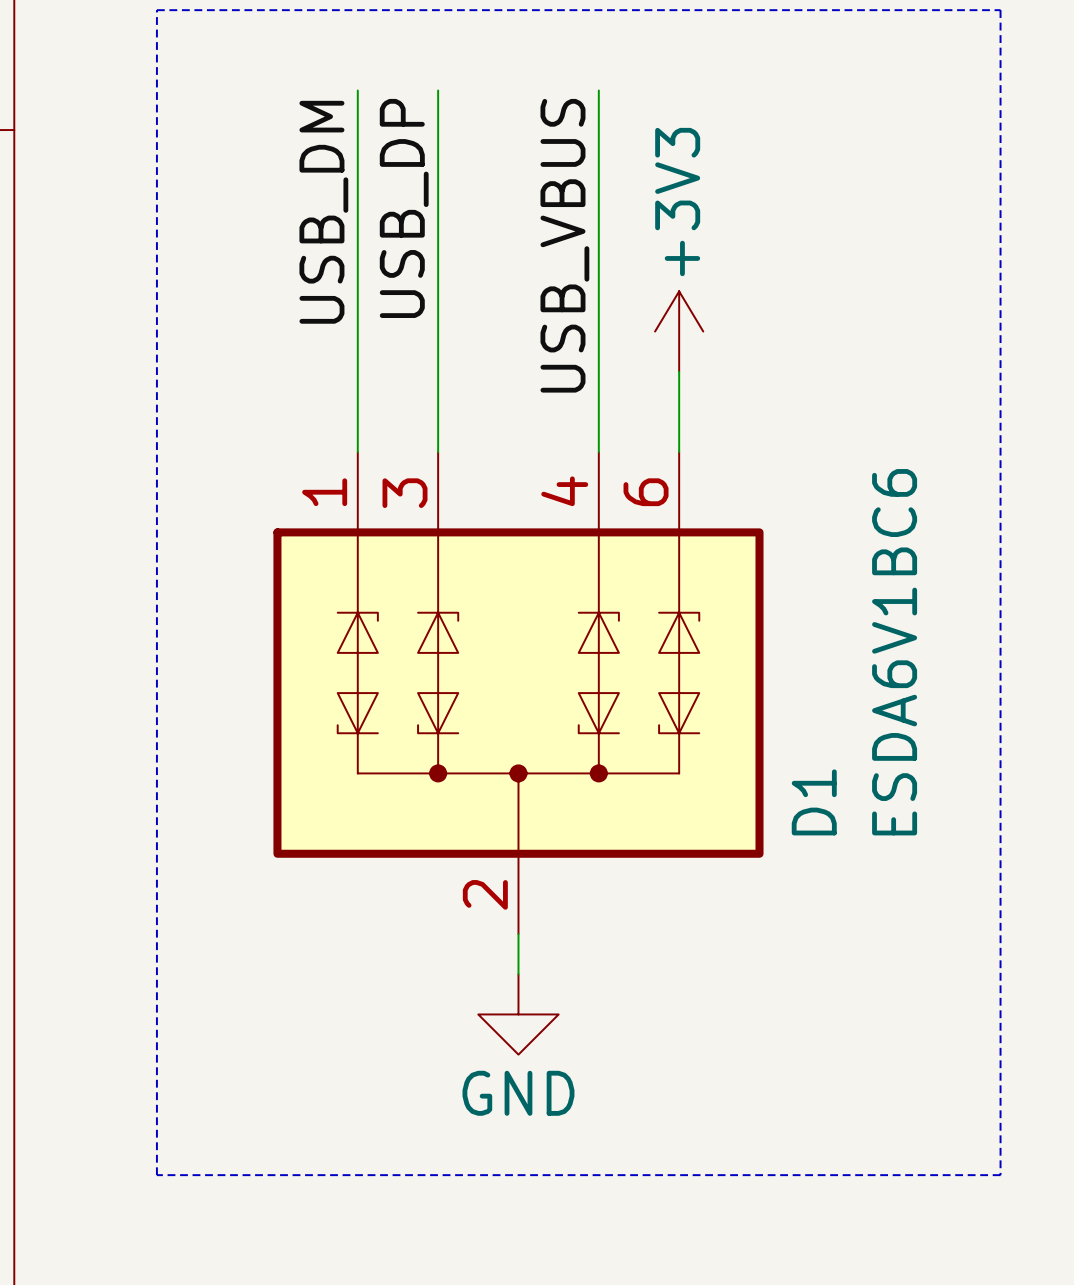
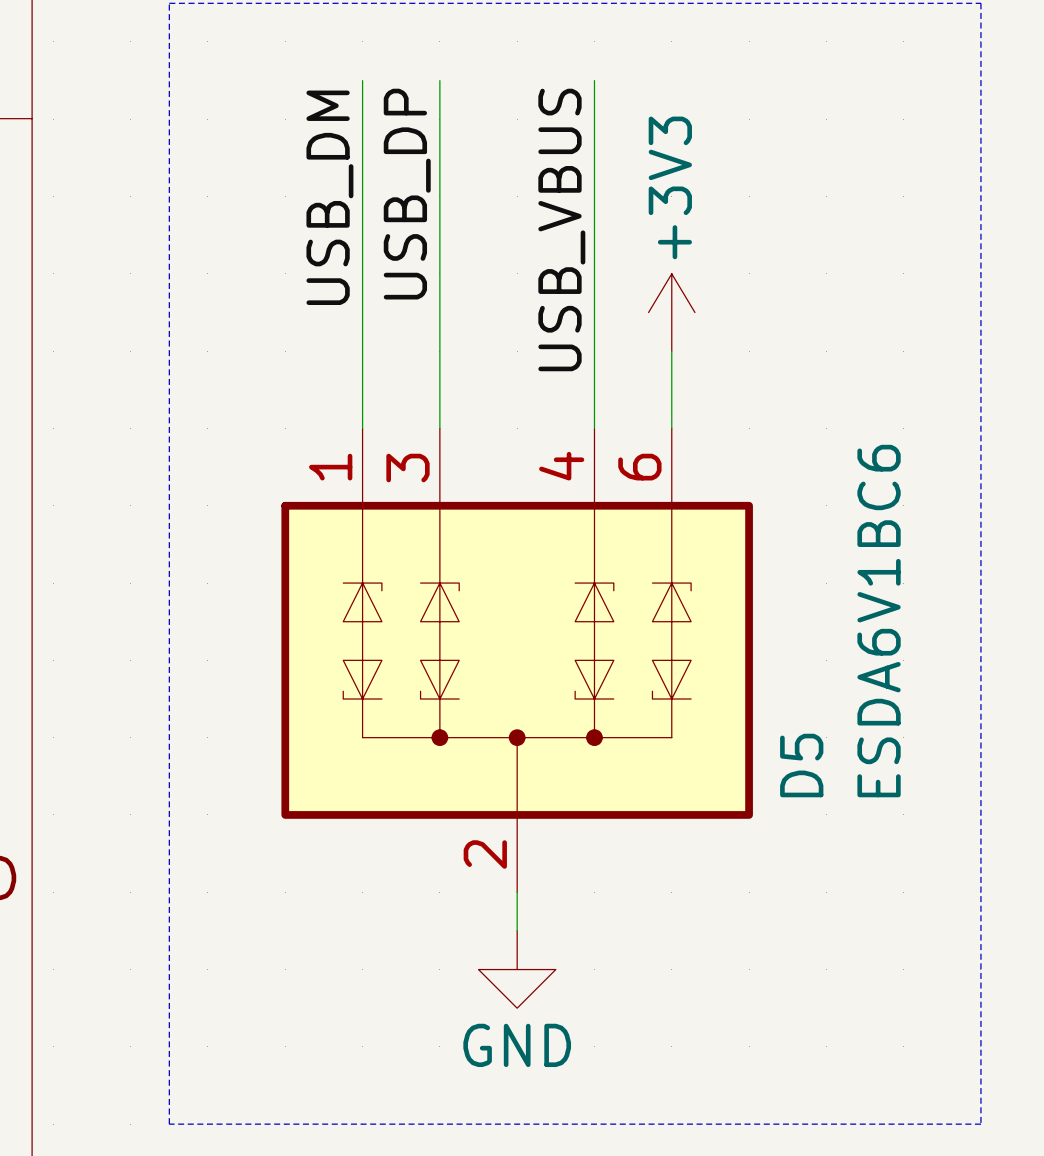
D1 name: D1 (814, 802) -> D5 (801, 765)

